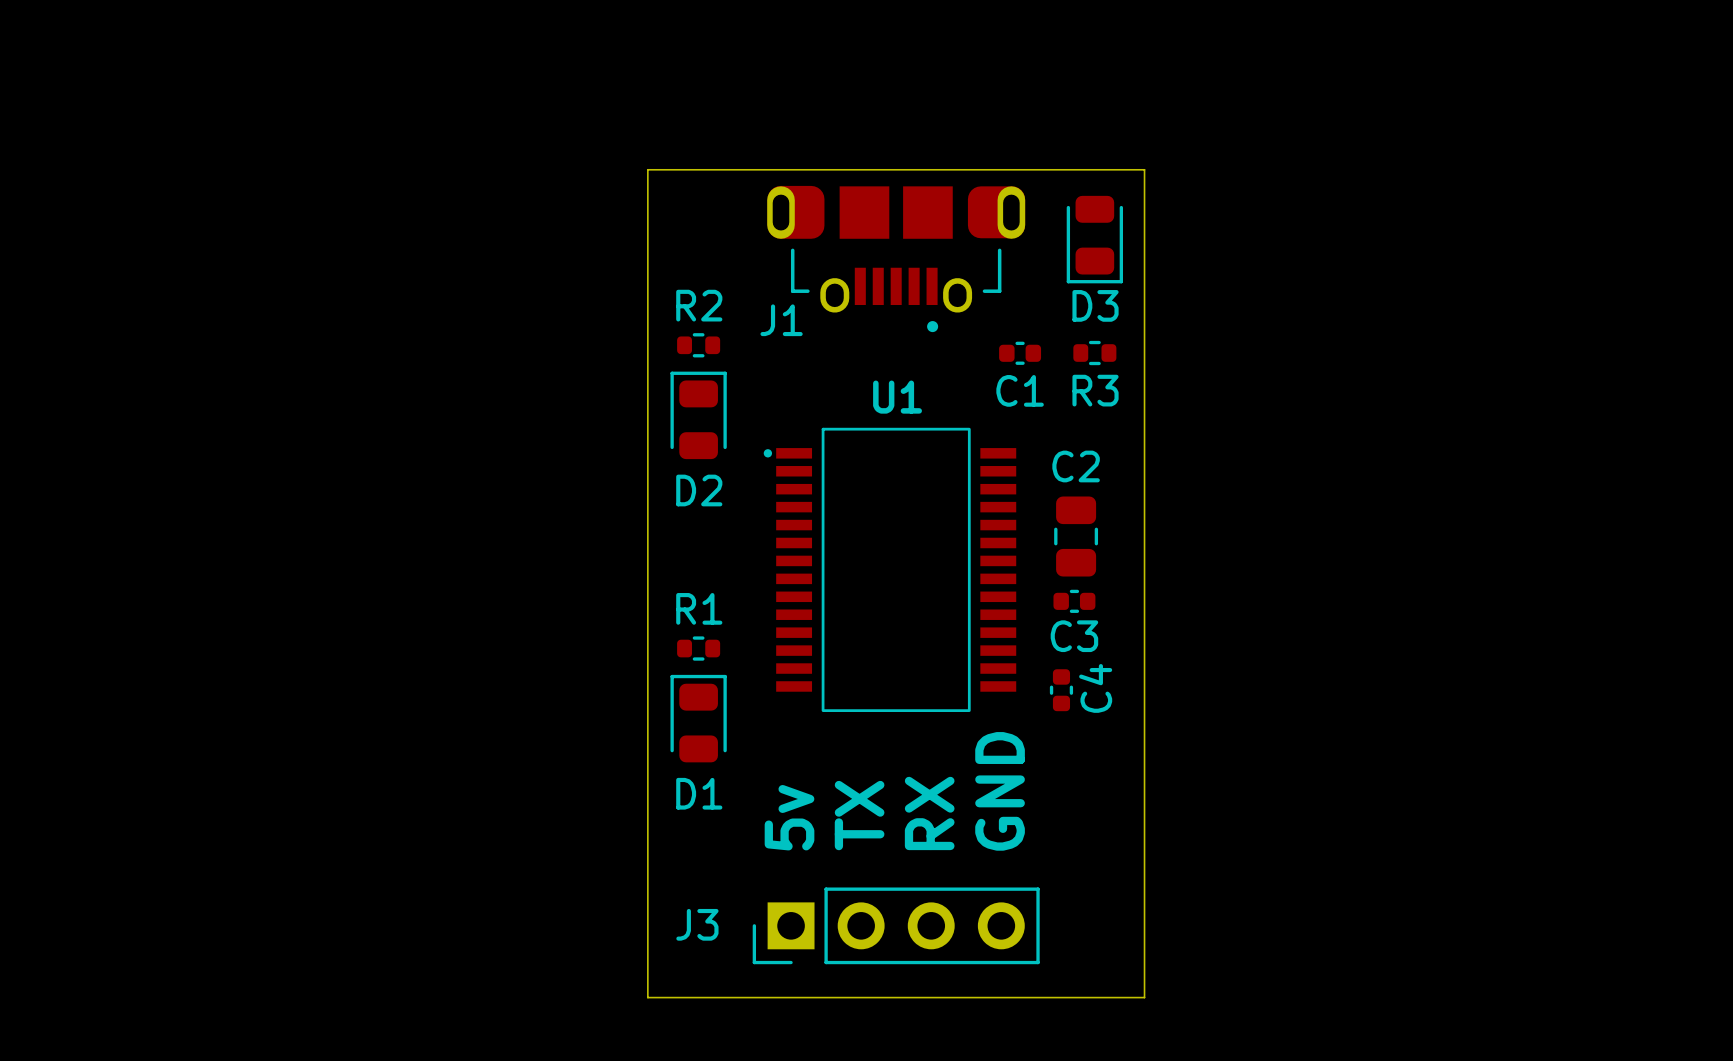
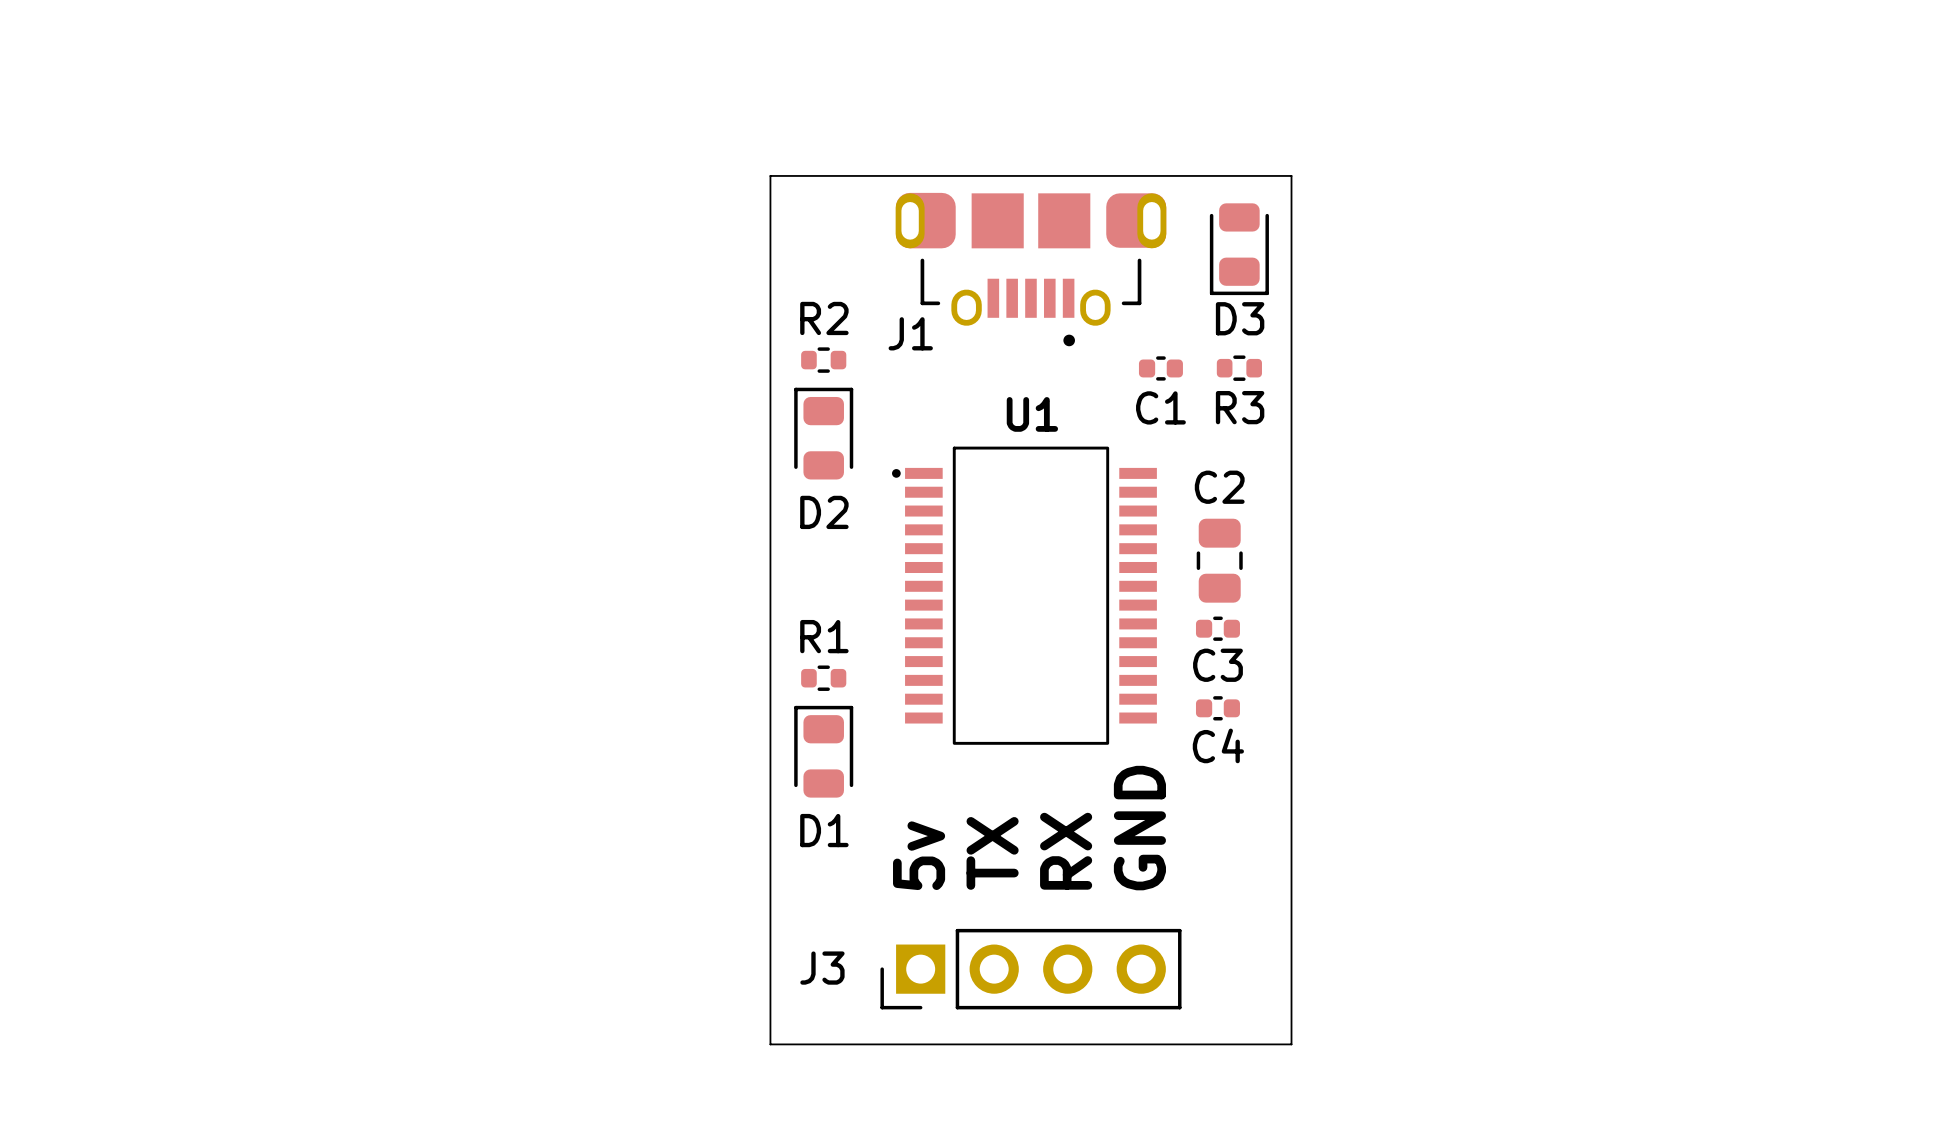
C4 rotation: 0° (1061, 690) -> 90° clockwise (1217, 708)

